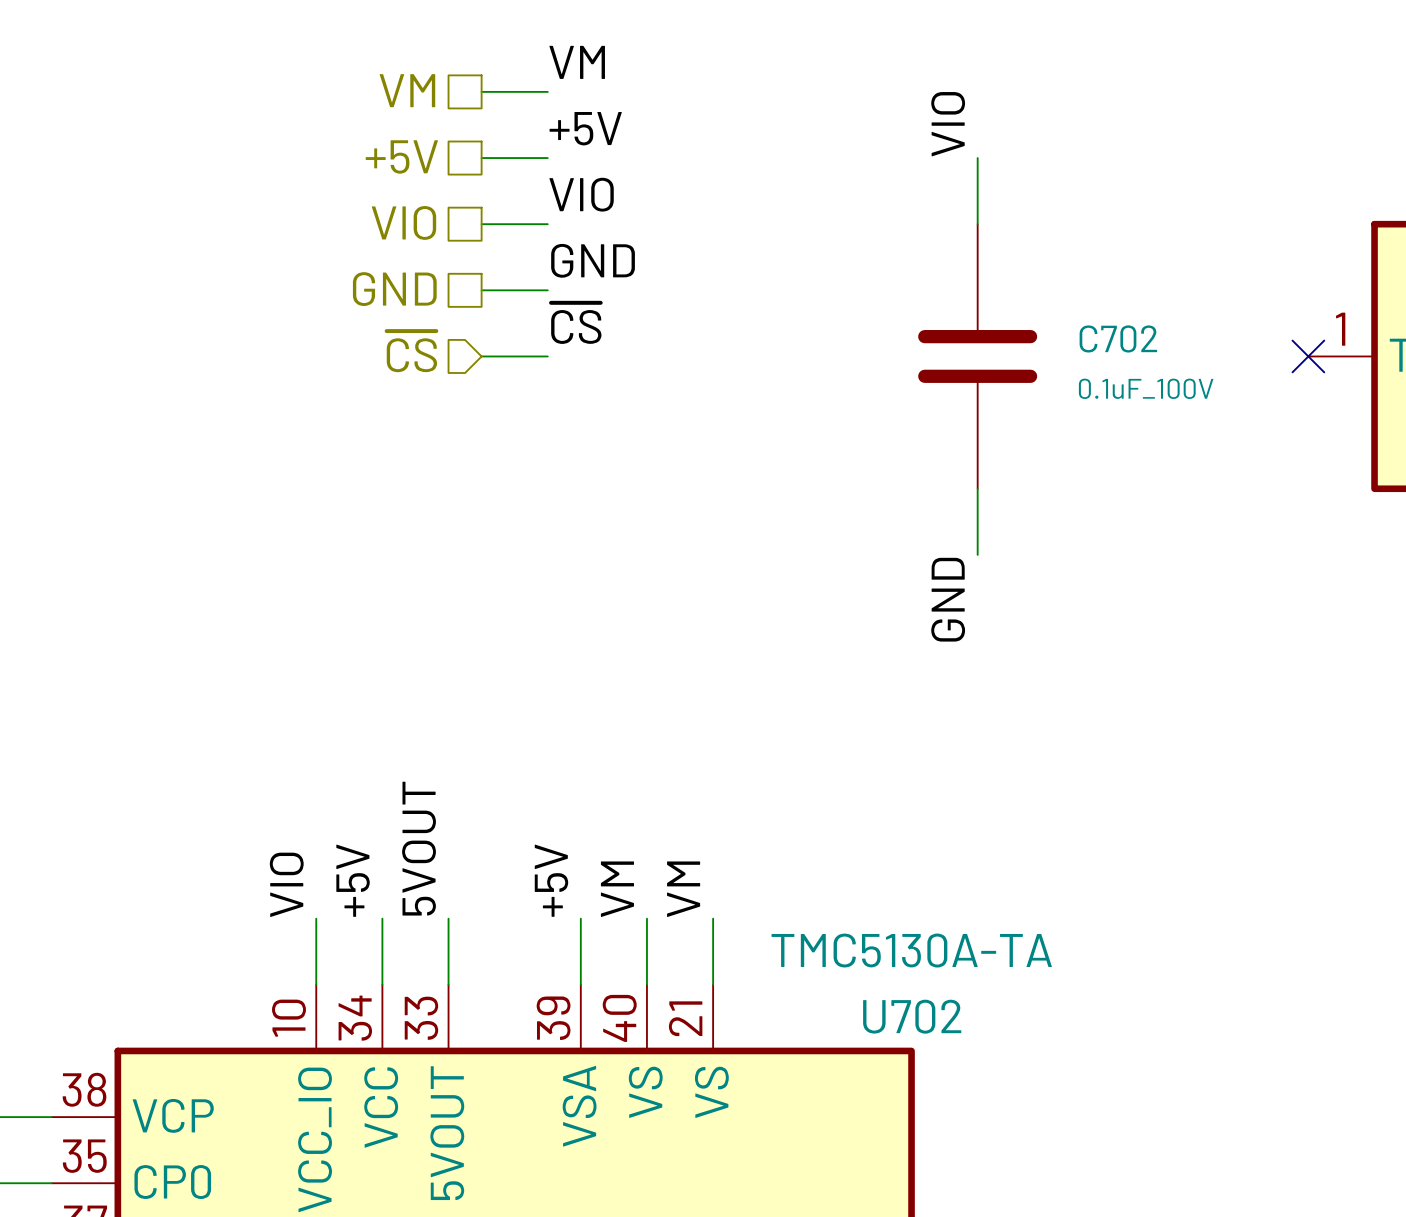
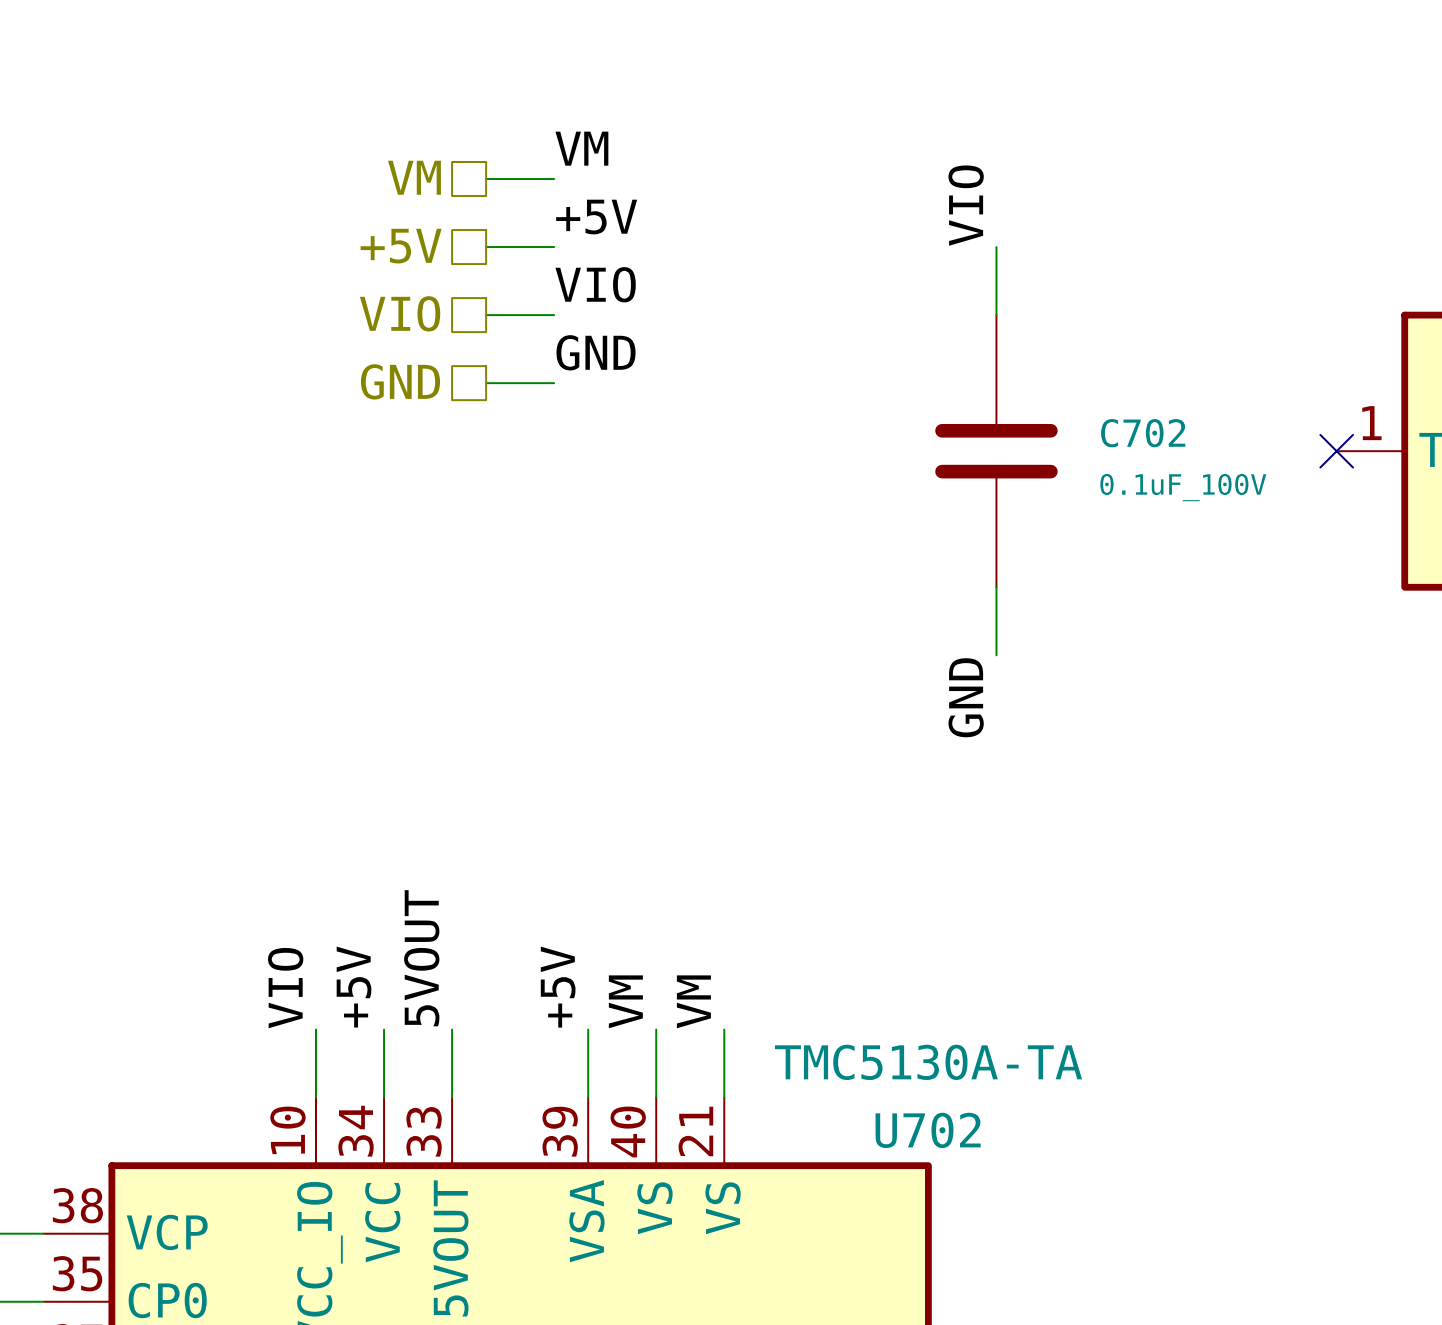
label: ~{CS} (576, 323) -> none
hierarchical label: ~{CS} (411, 351) -> none
wire: (481, 356) (547, 356) -> none

